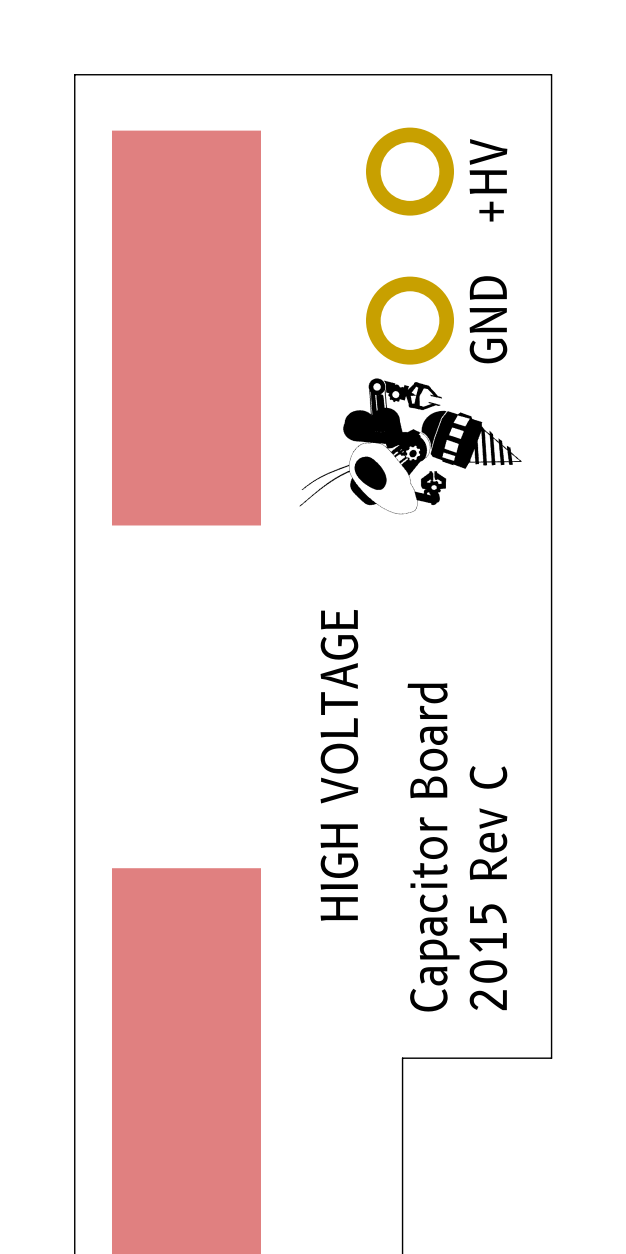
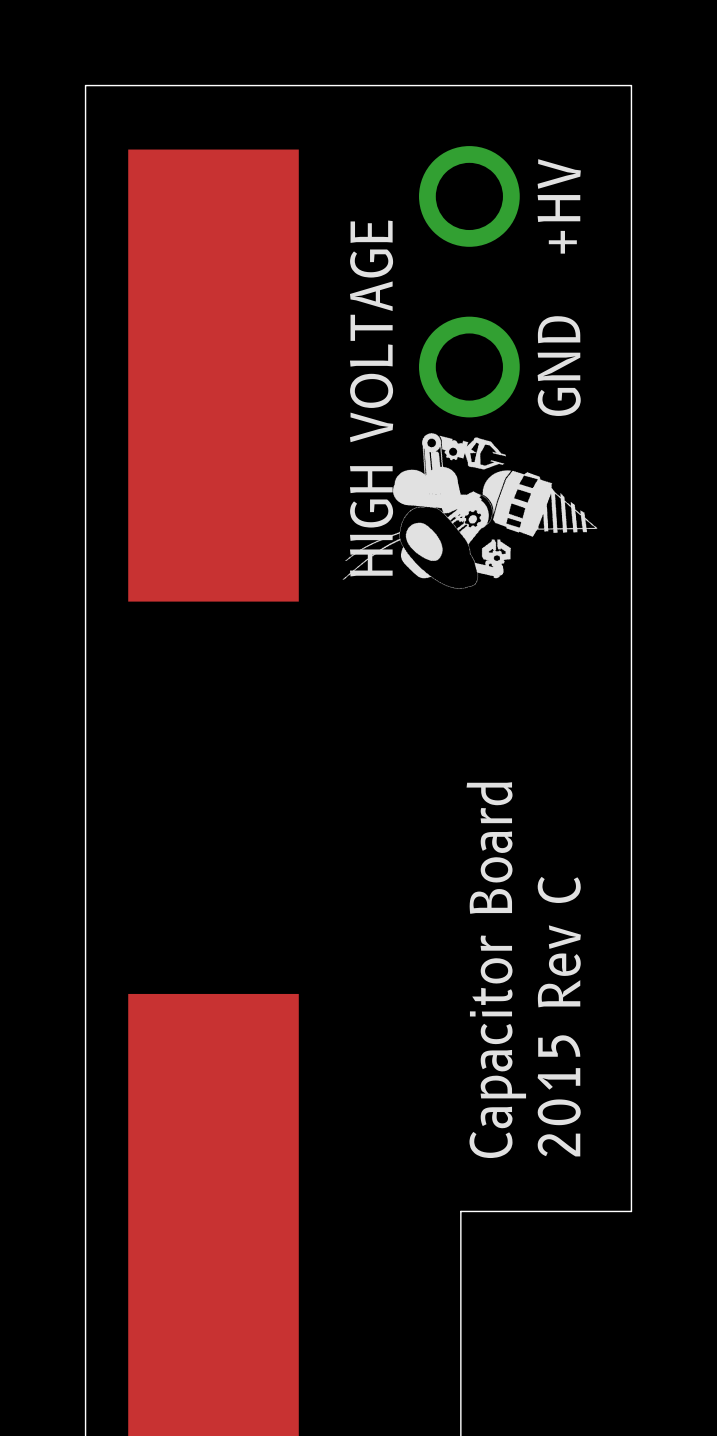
text position: HIGH VOLTAGE (339, 765) -> HIGH VOLTAGE (371, 398)

